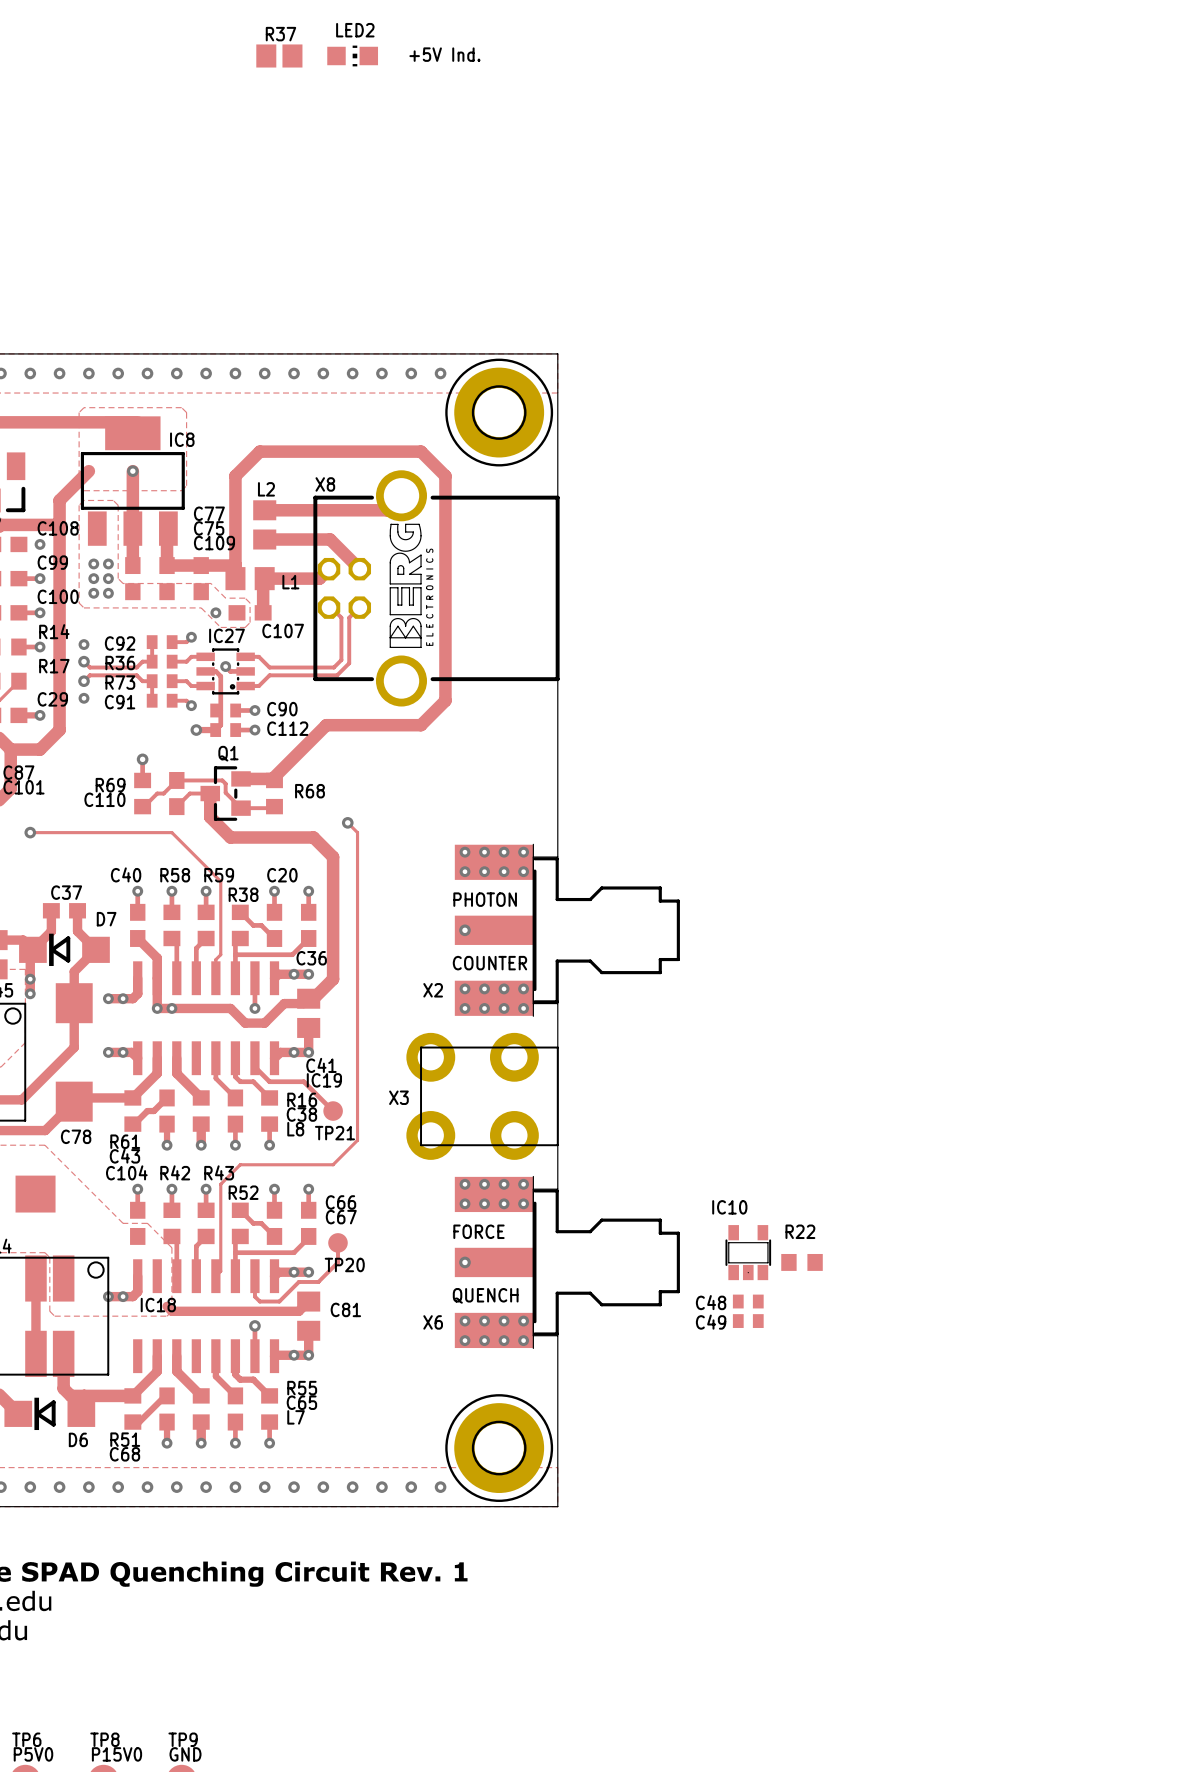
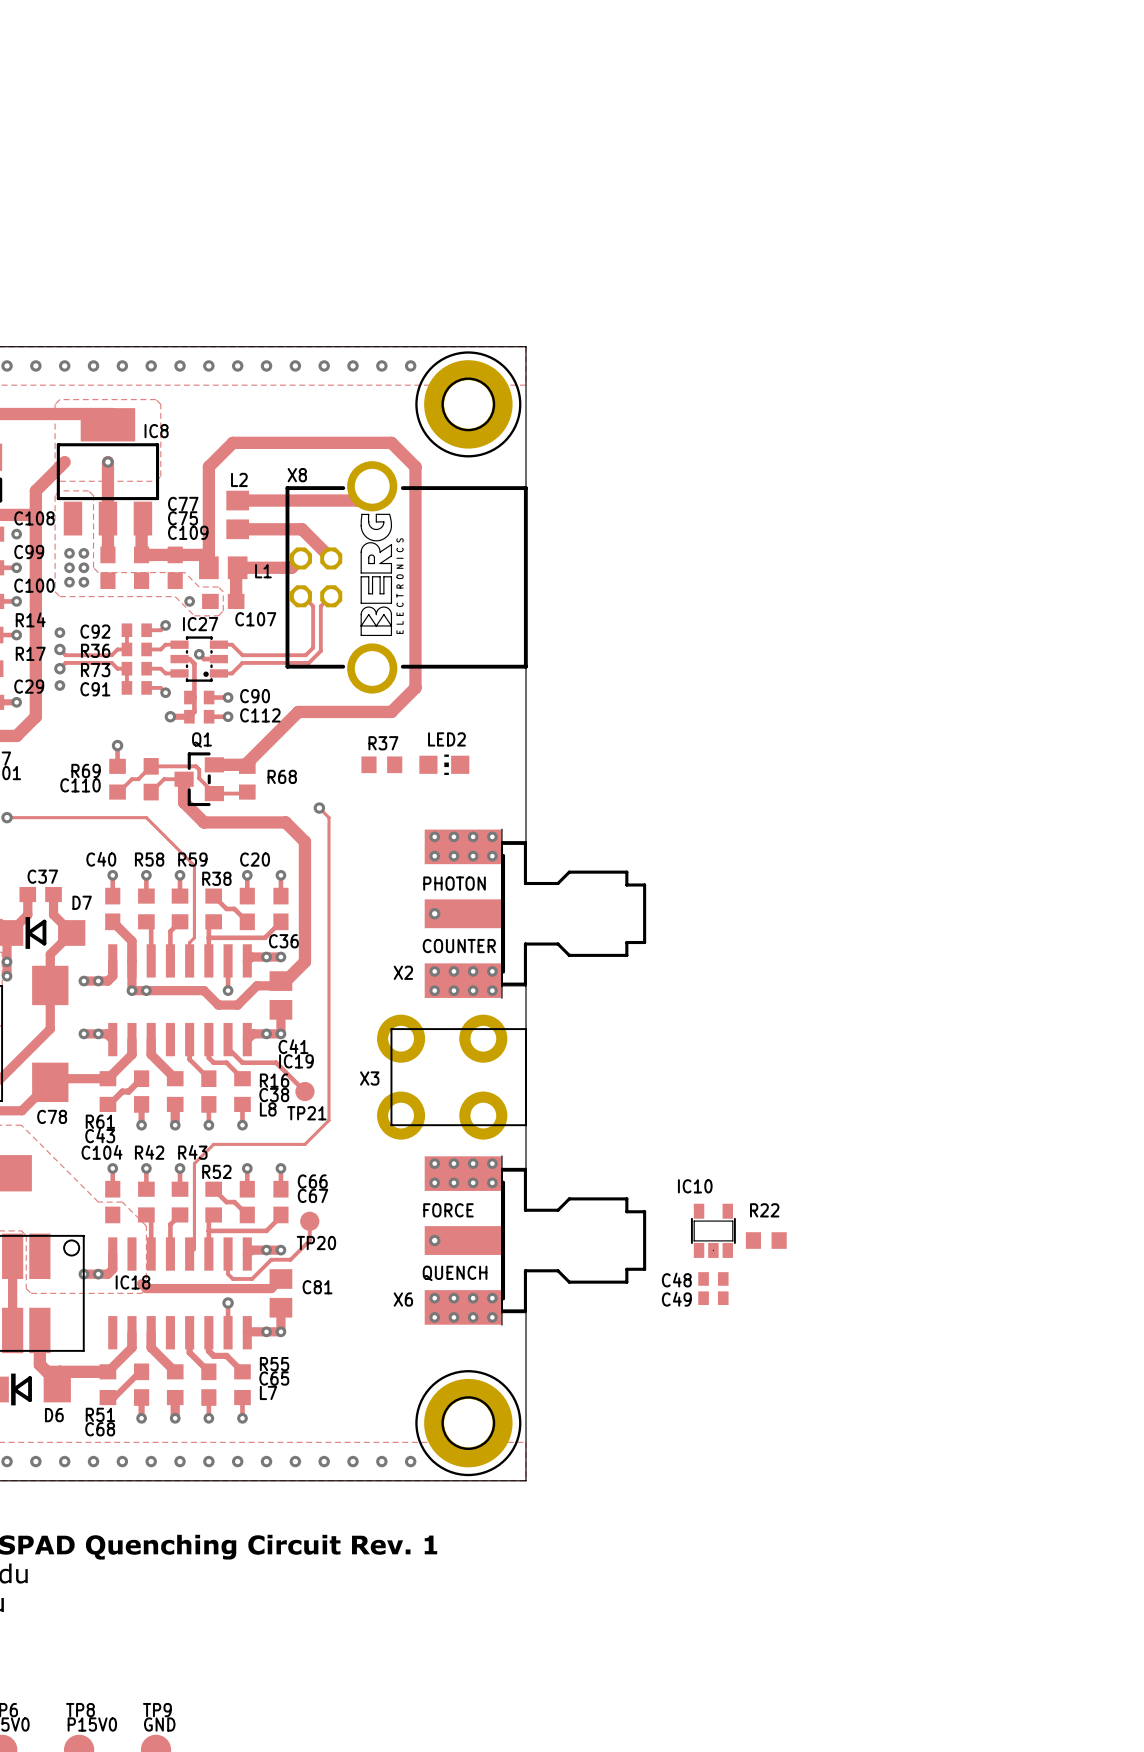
R37 footprint: [256, 44, 303, 68] -> [361, 756, 403, 774]
text: +5V Ind. (444, 54) -> none
LED2 position: (352, 55) -> (444, 764)

